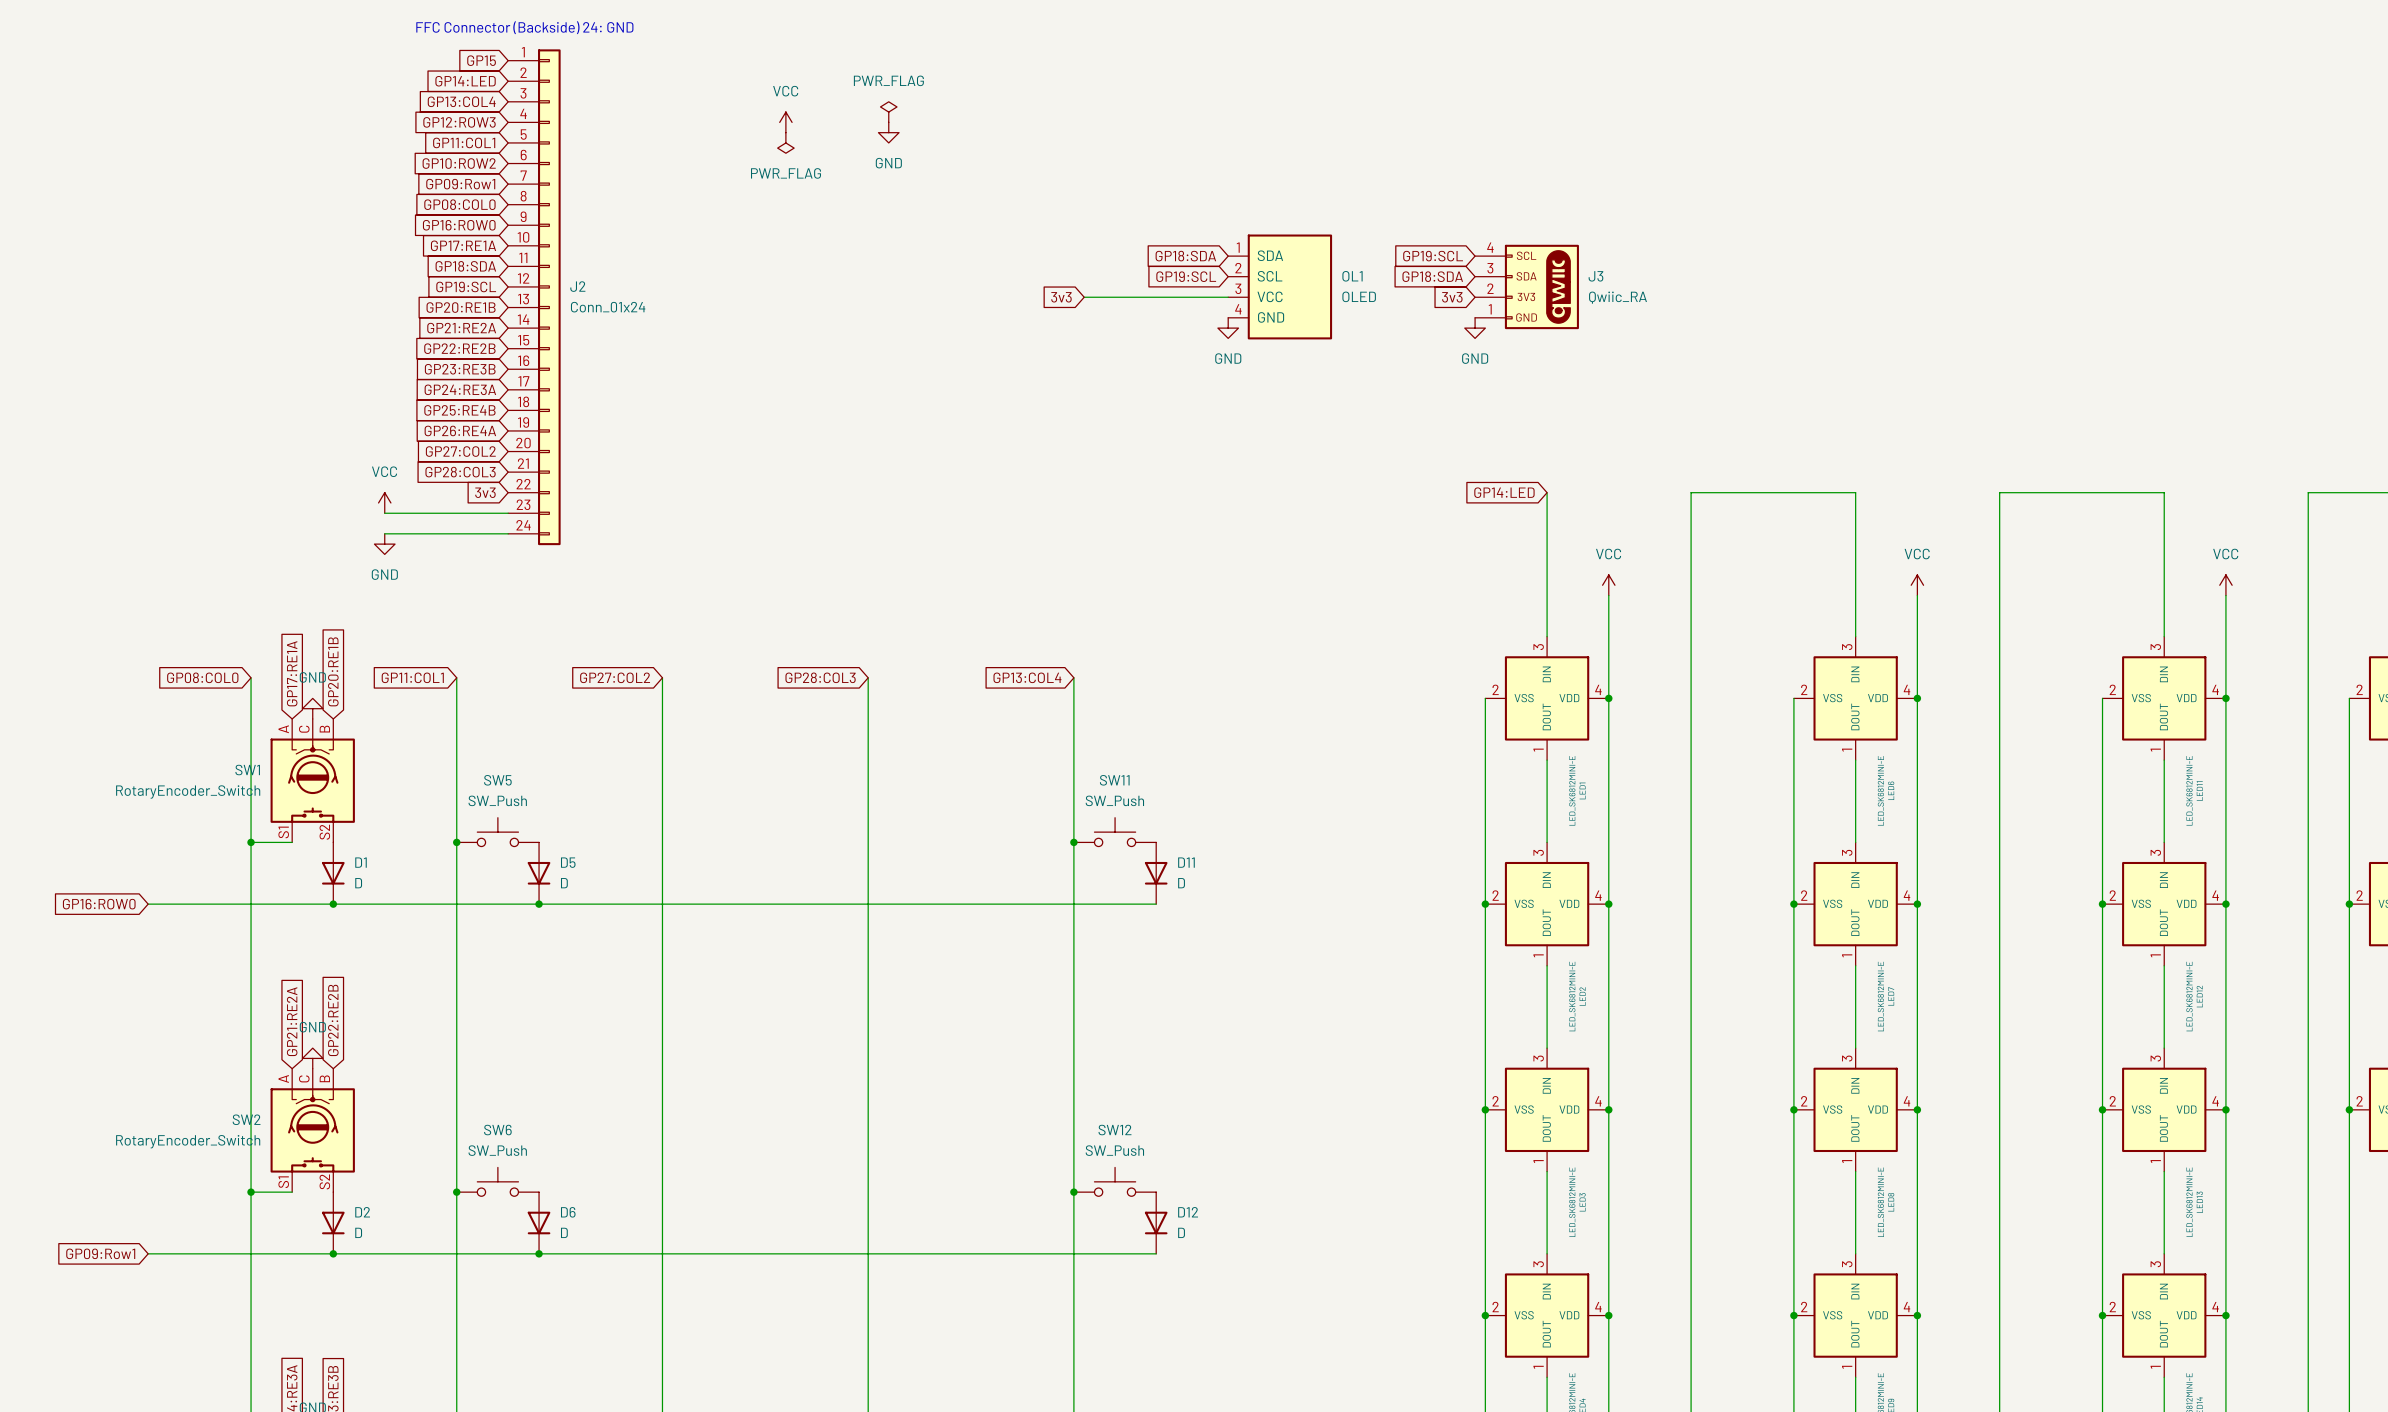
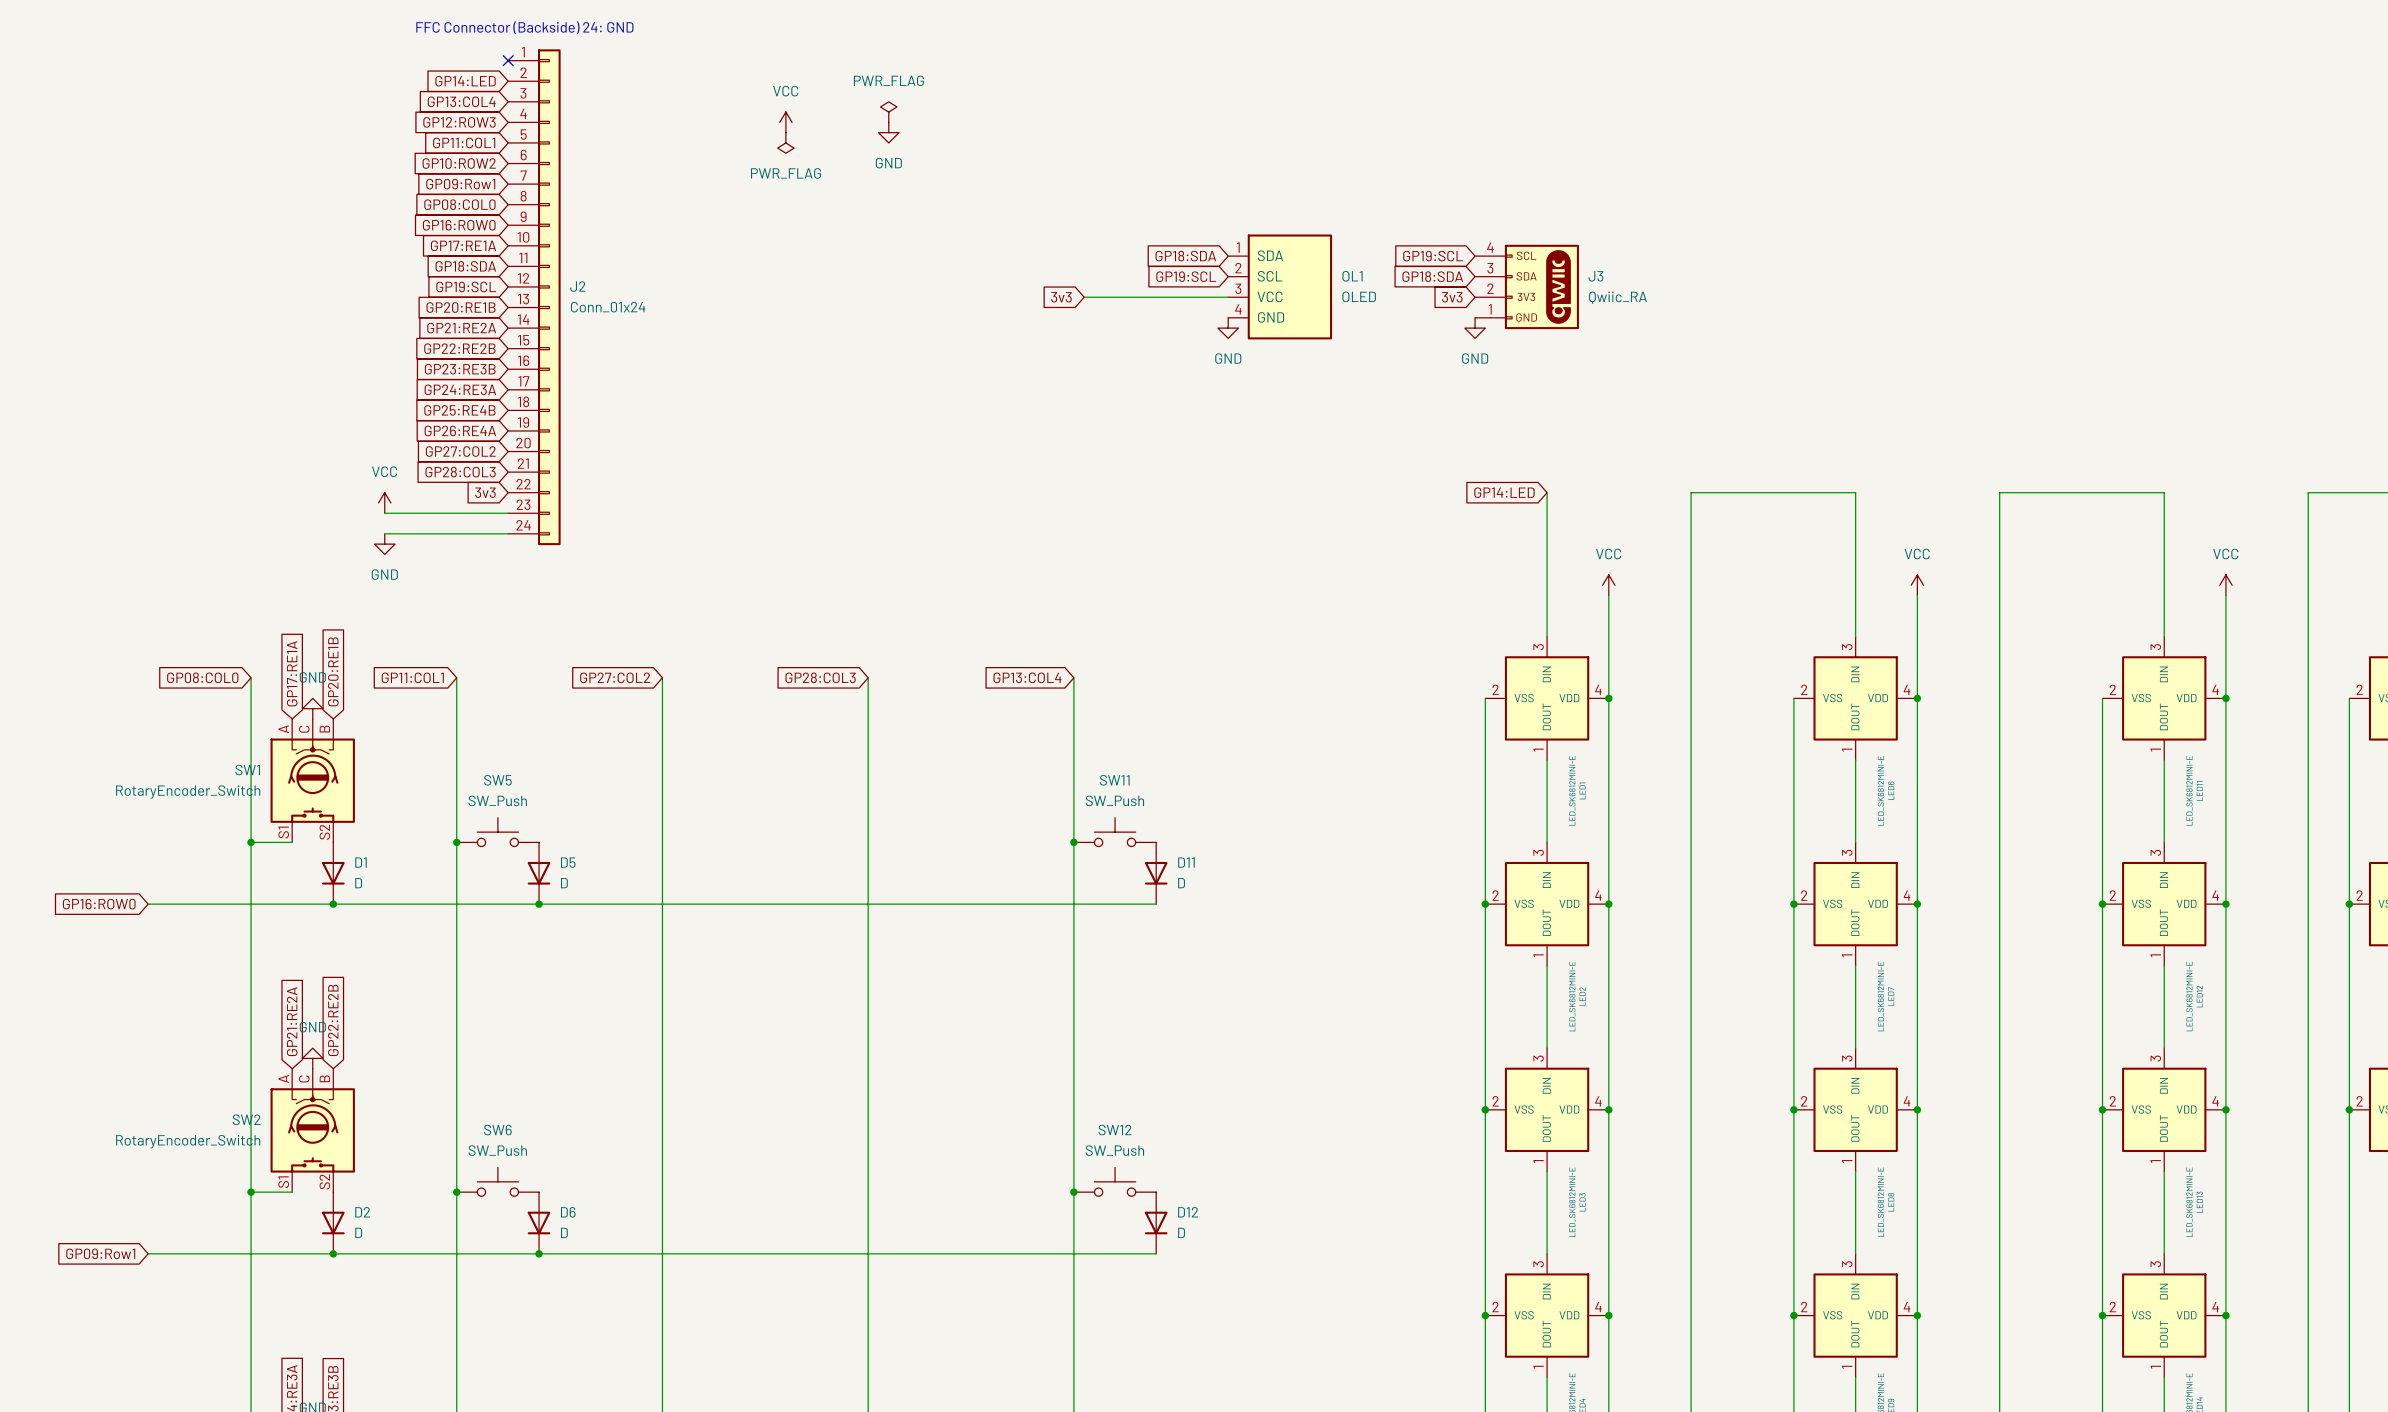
global label: GP15 (481, 60) -> none
no-connect mark: none -> (508, 60)

